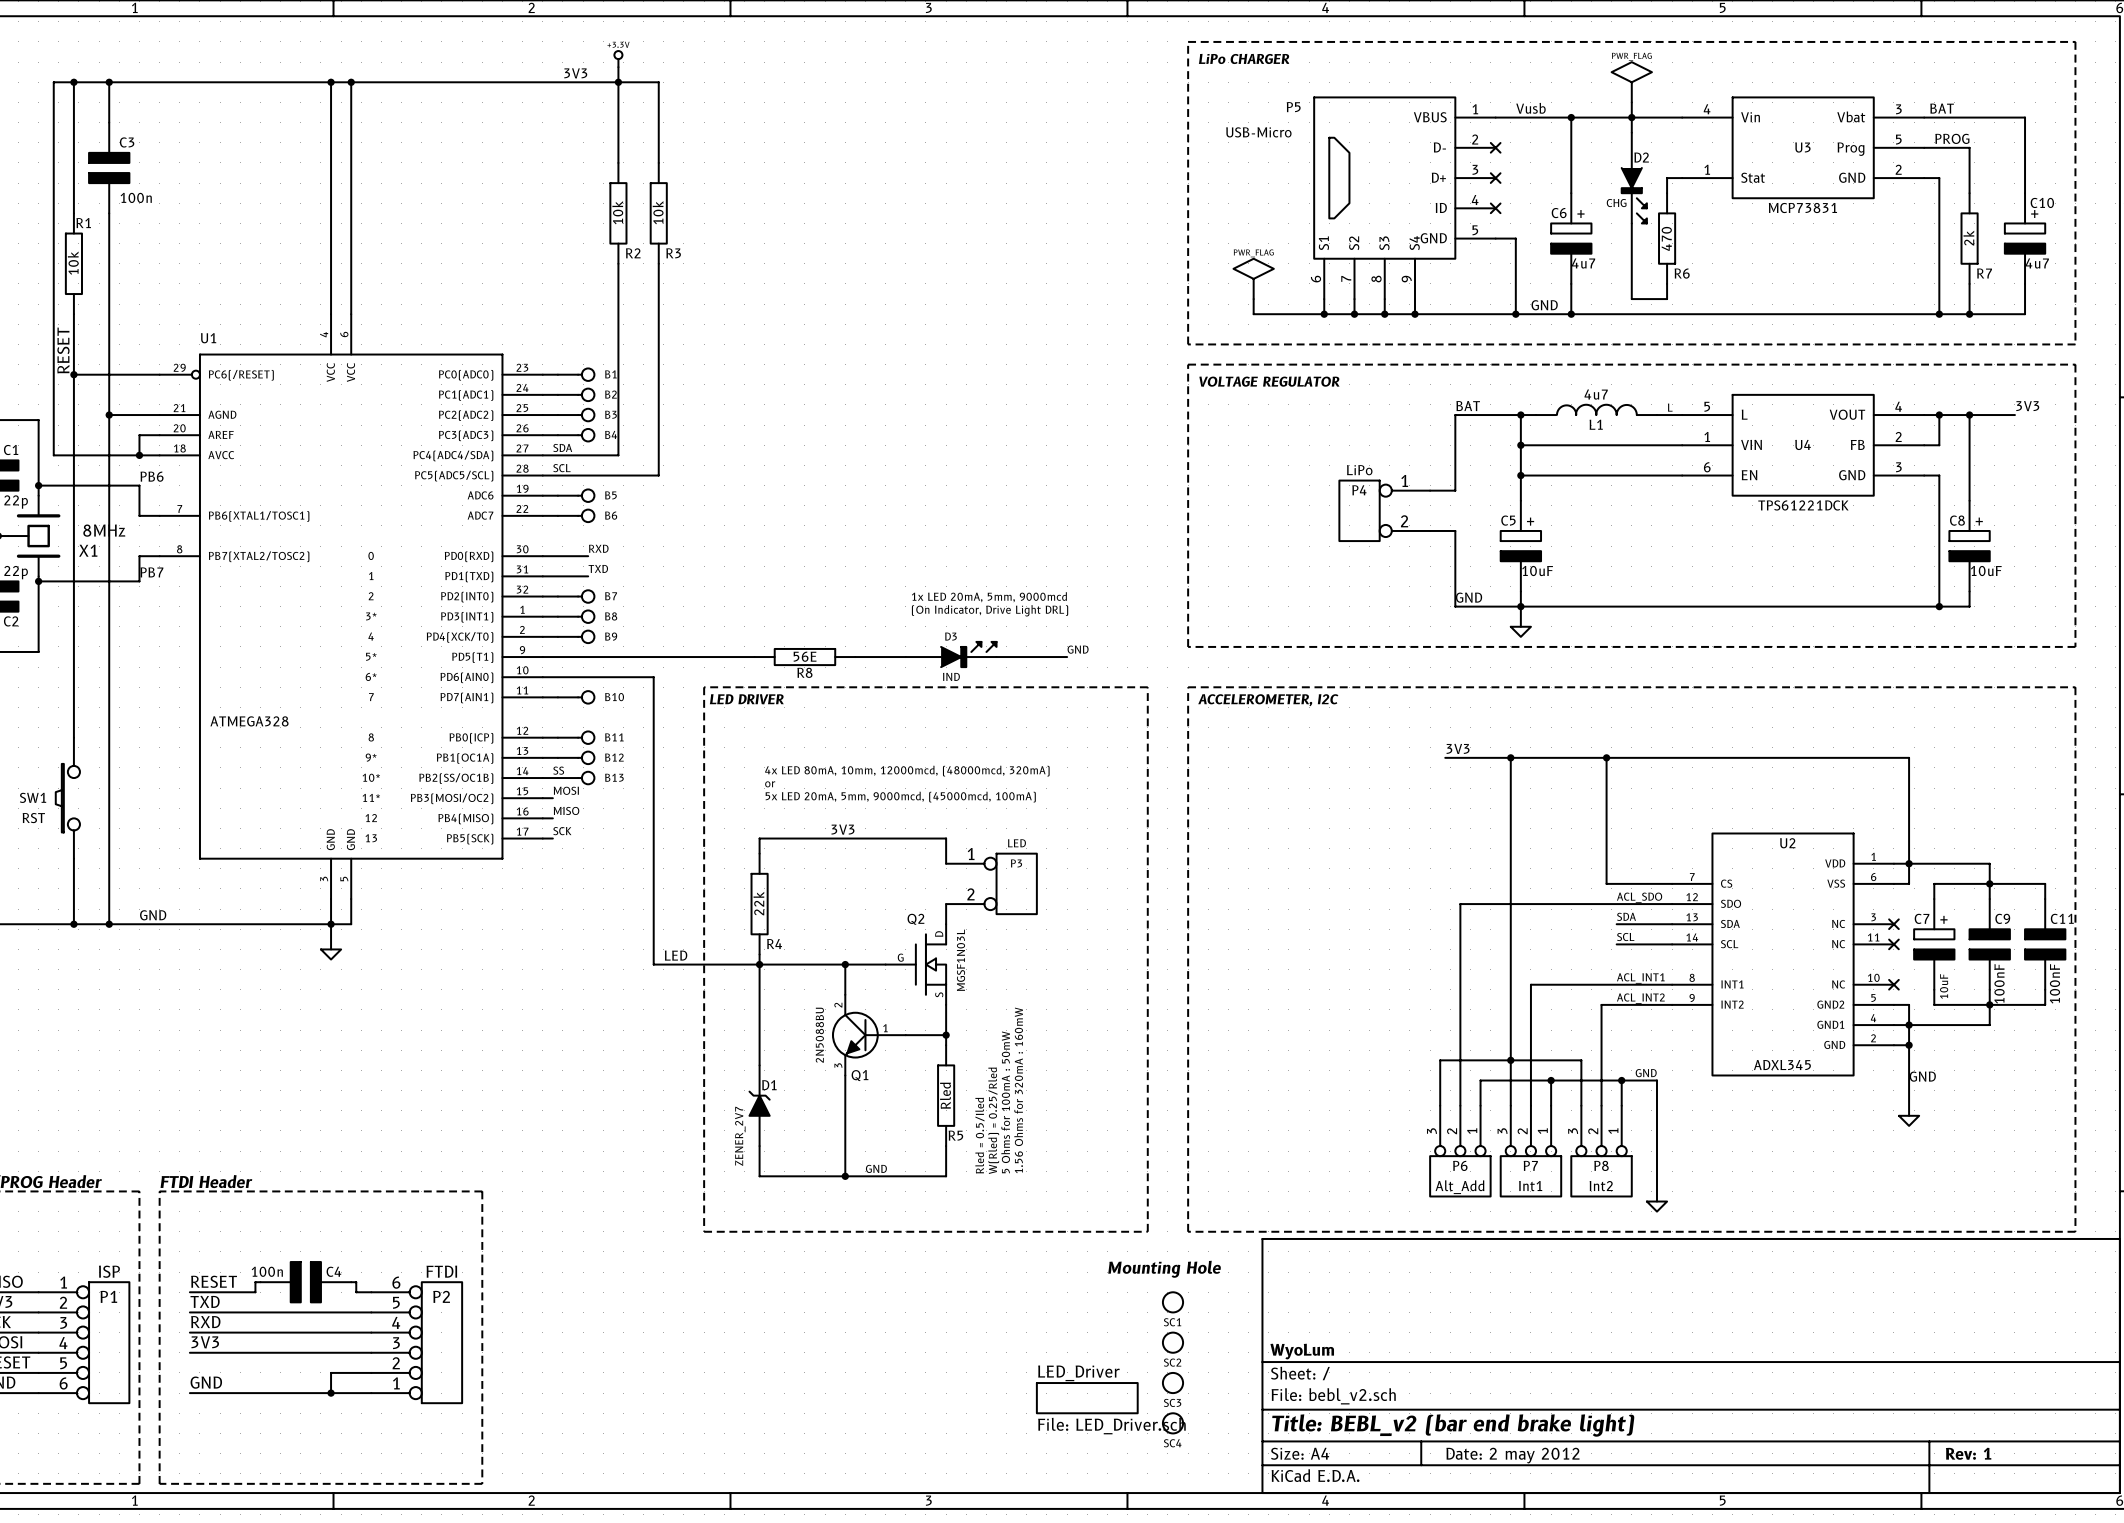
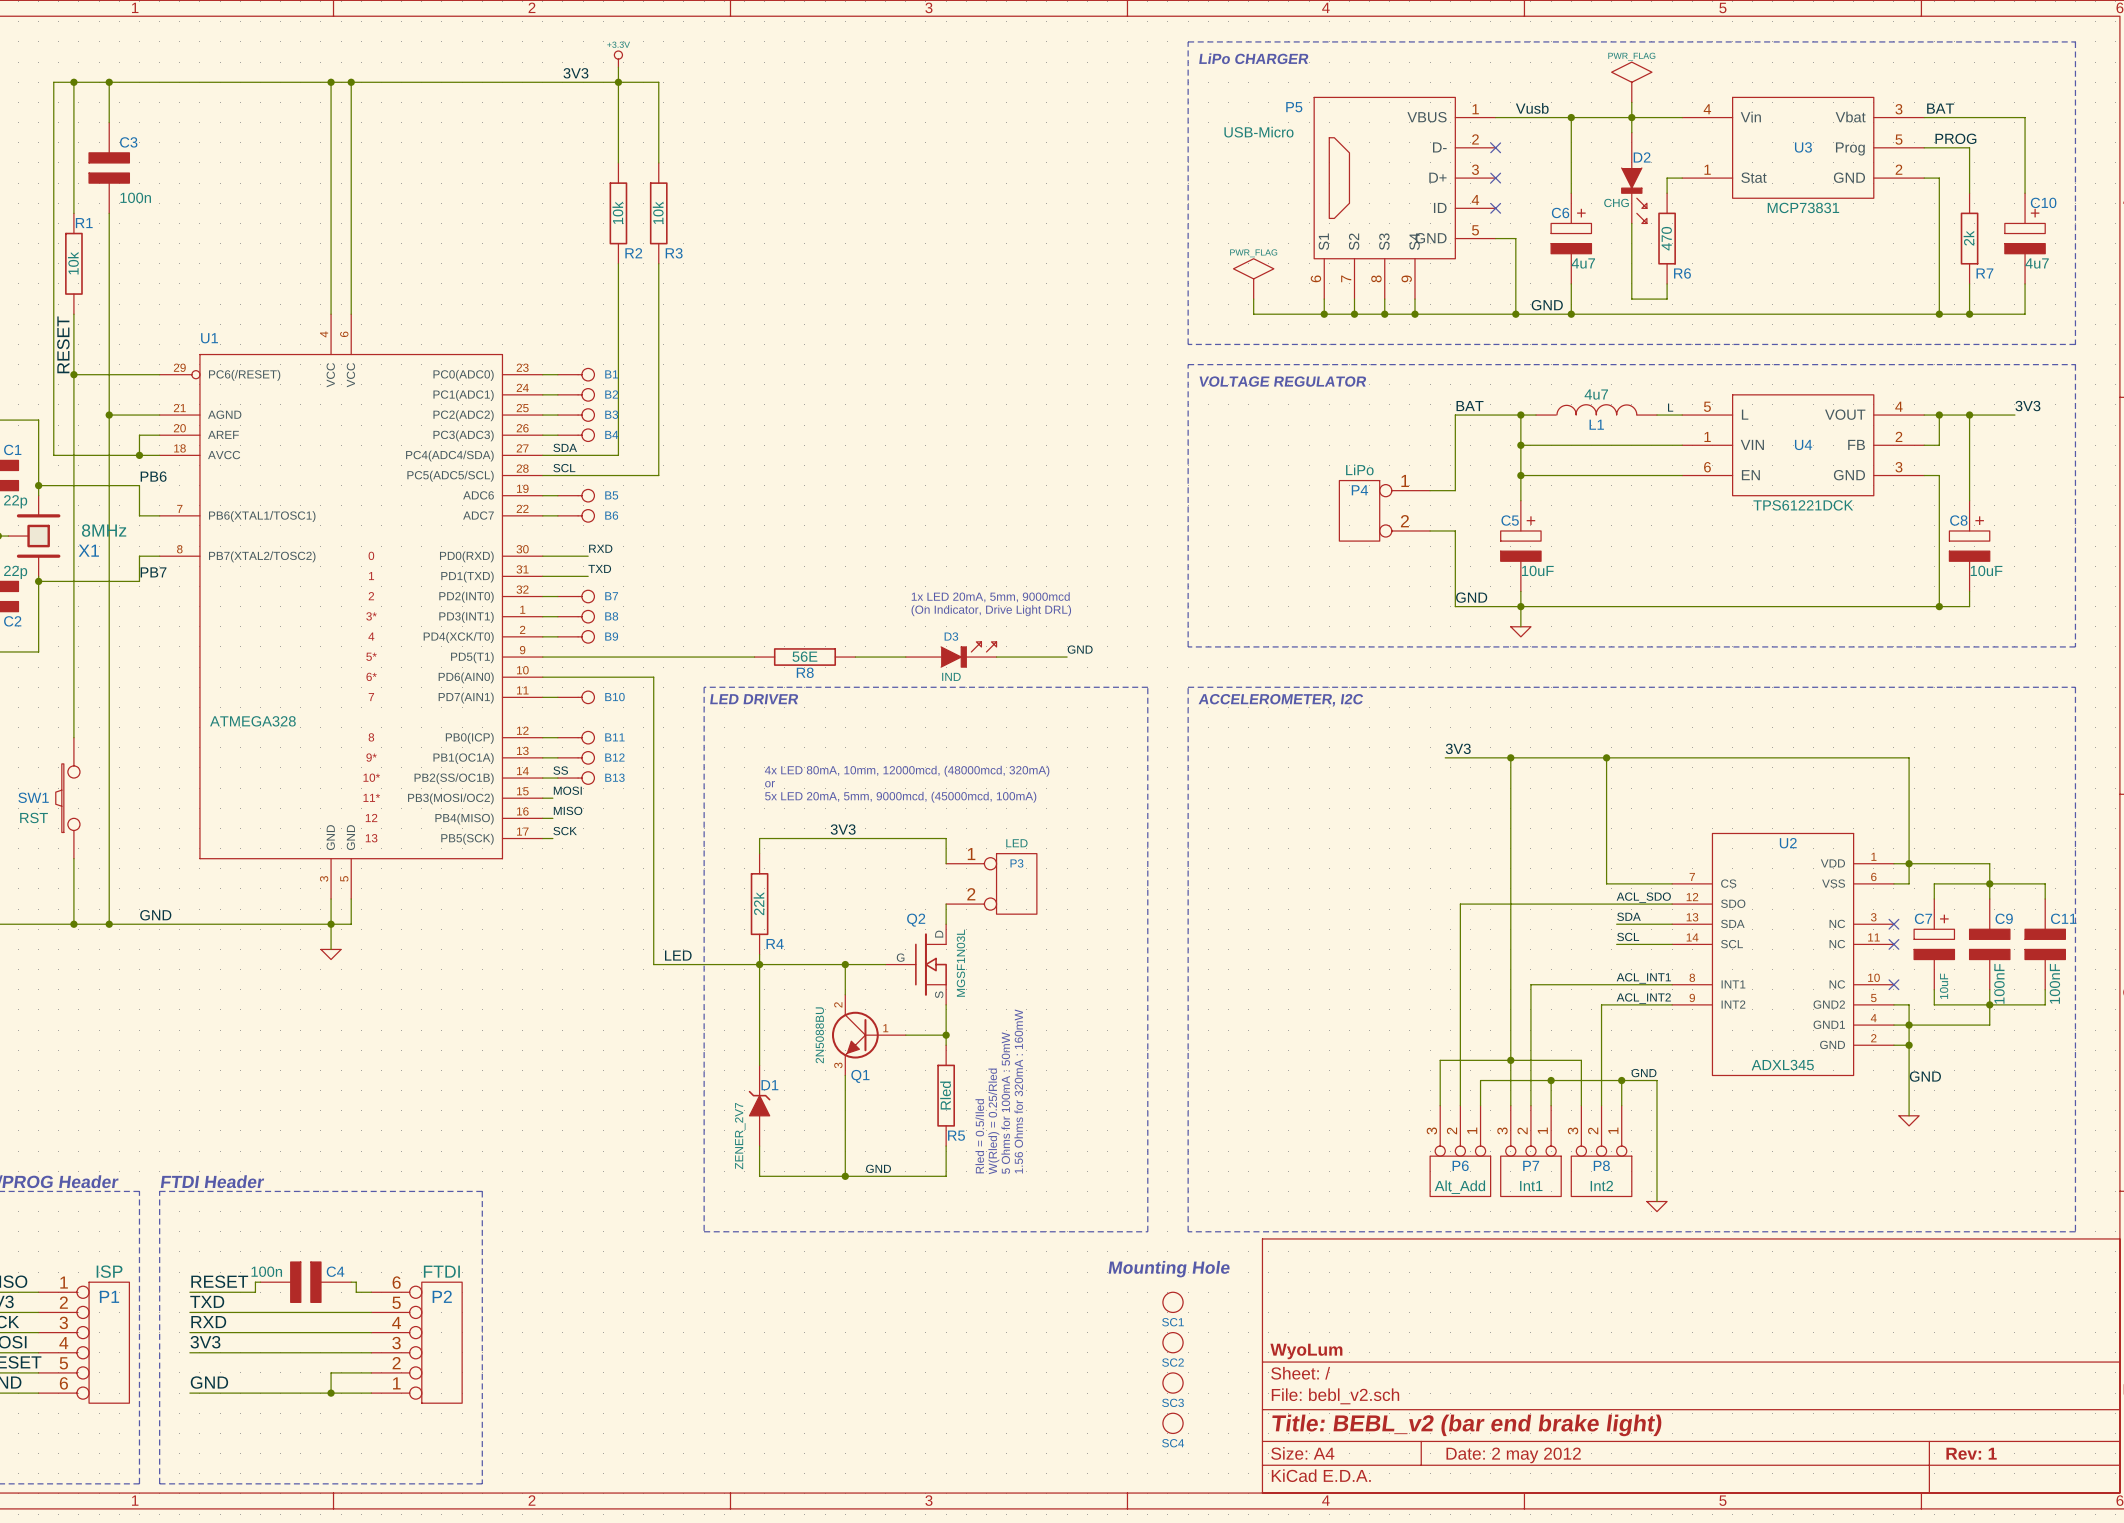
sheet LED_Driver: File: LED_Driver.sch (1087, 1398) -> none

